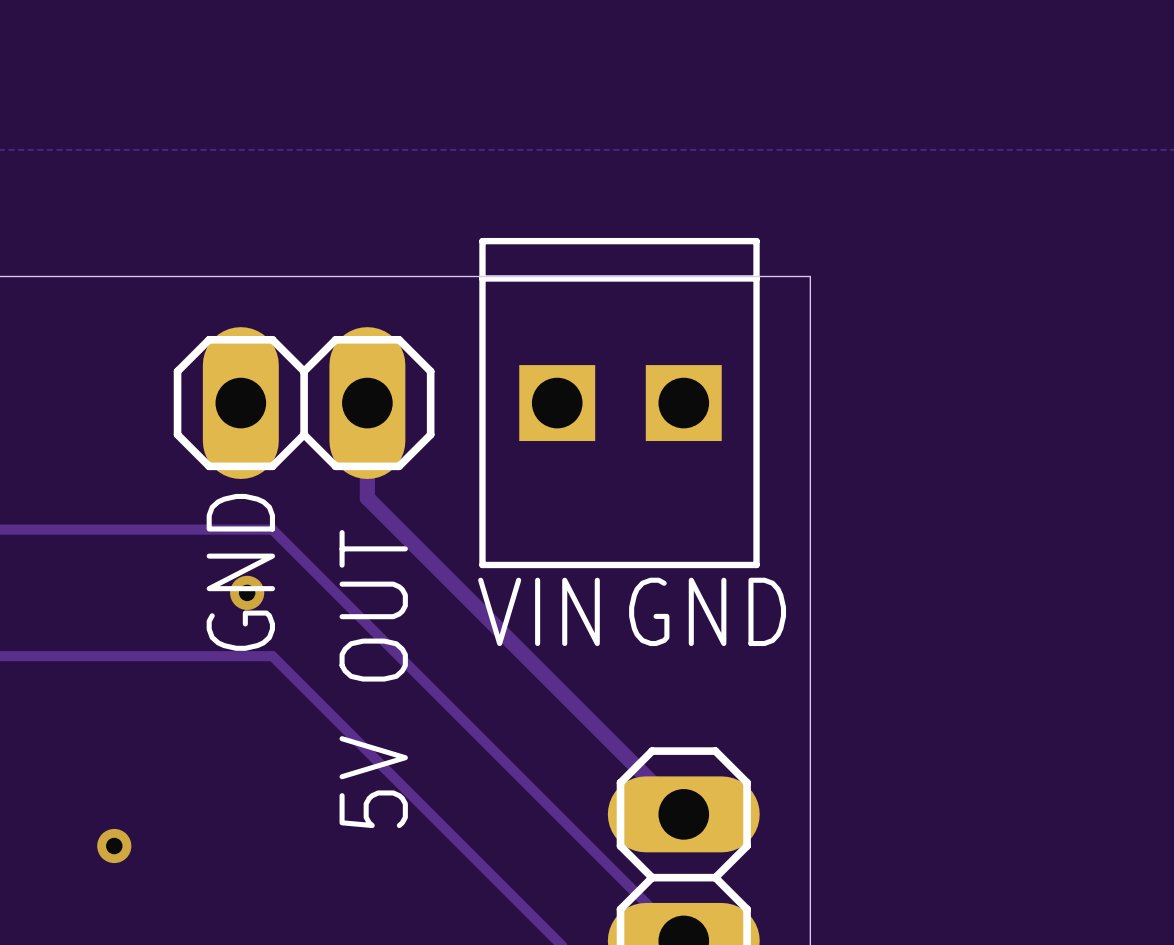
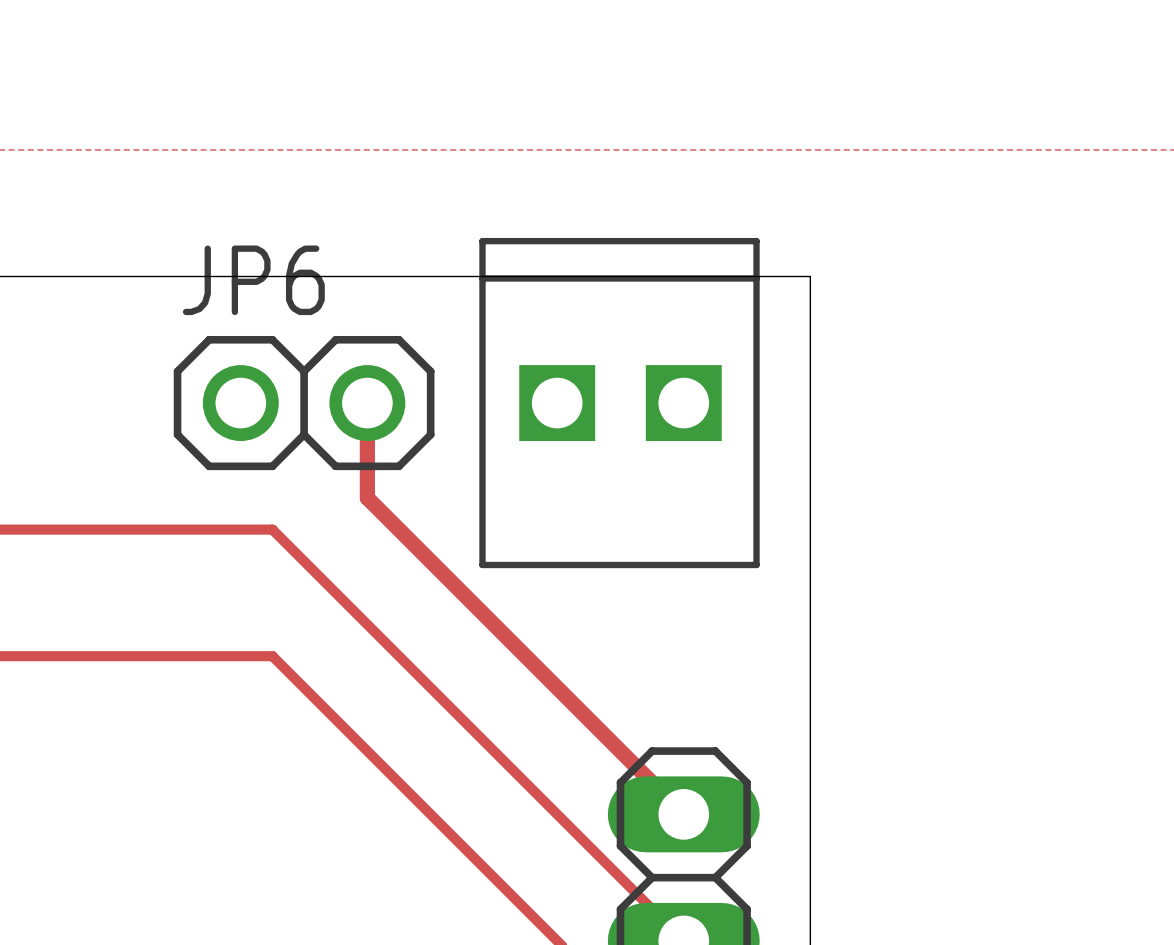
part: (304, 403) -> none
JP6: none -> (304, 403)
text: GND (240, 572) -> none
via: (247, 592) -> none
text: VIN (538, 611) -> none
text: GND (707, 611) -> none
text: 5V OUT (373, 679) -> none
via: (114, 846) -> none

